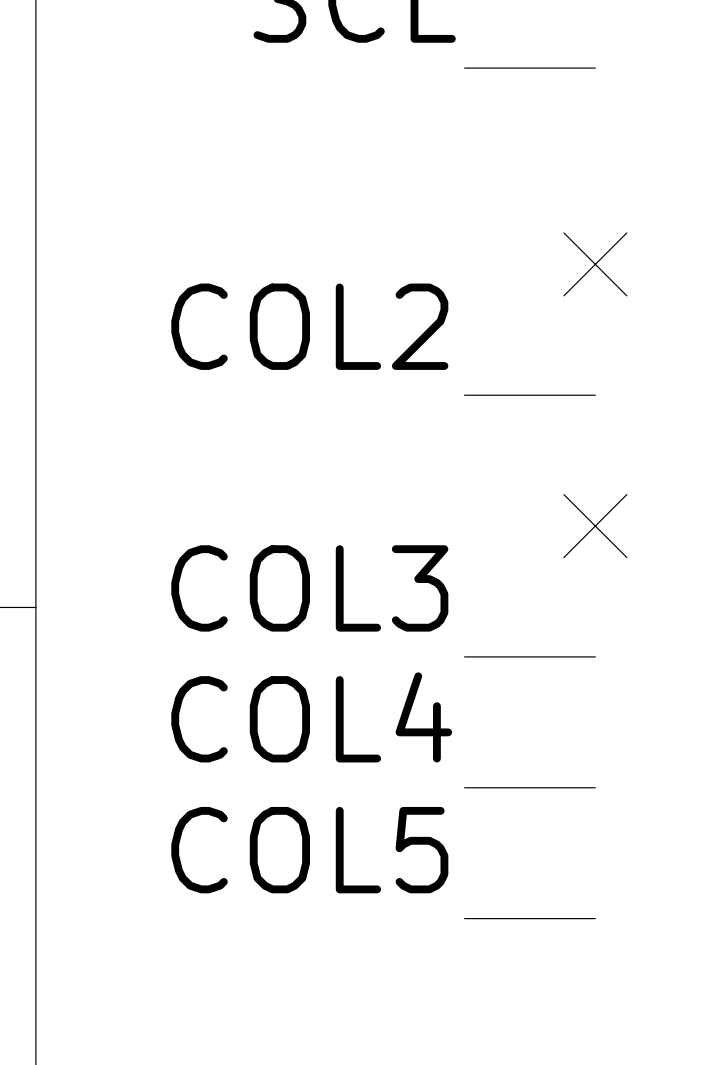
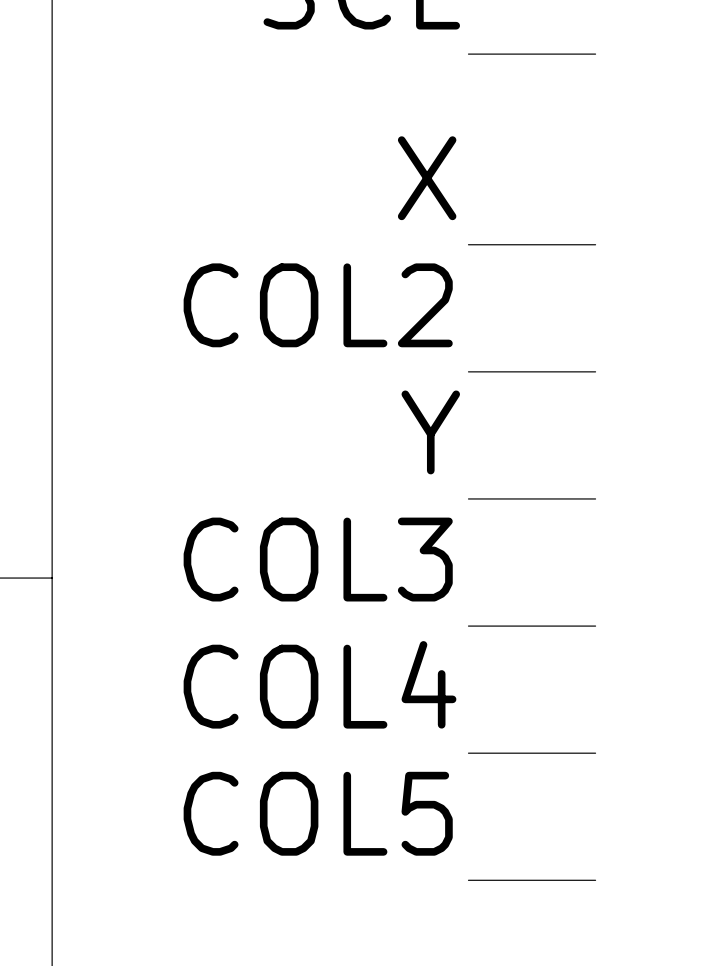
label: none -> X (427, 178)
wire: none -> (468, 244) (595, 244)
no-connect mark: (595, 264) -> none
label: none -> Y (430, 432)
wire: none -> (468, 498) (595, 498)
no-connect mark: (595, 526) -> none

